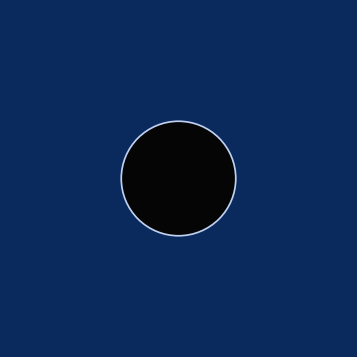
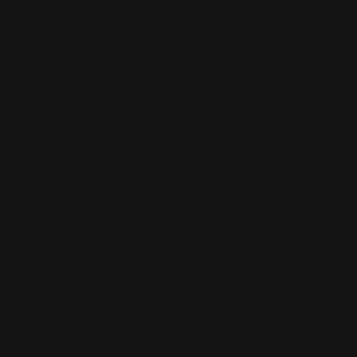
hole: (178, 178) -> none

